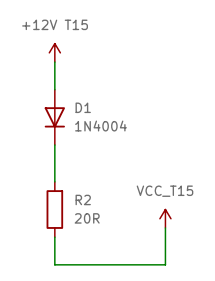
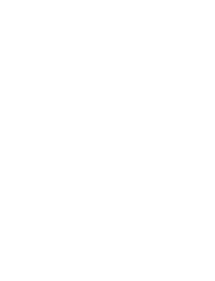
power symbol: +12V T15 (54, 52) -> none
wire: (54, 62) (54, 89) -> none
D1: 1N4004 (54, 117) -> none
wire: (54, 145) (54, 181) -> none
R2: 20R (54, 209) -> none
power symbol: VCC_T15 (165, 218) -> none
wire: (165, 227) (165, 264) (54, 264) (54, 237) -> none

